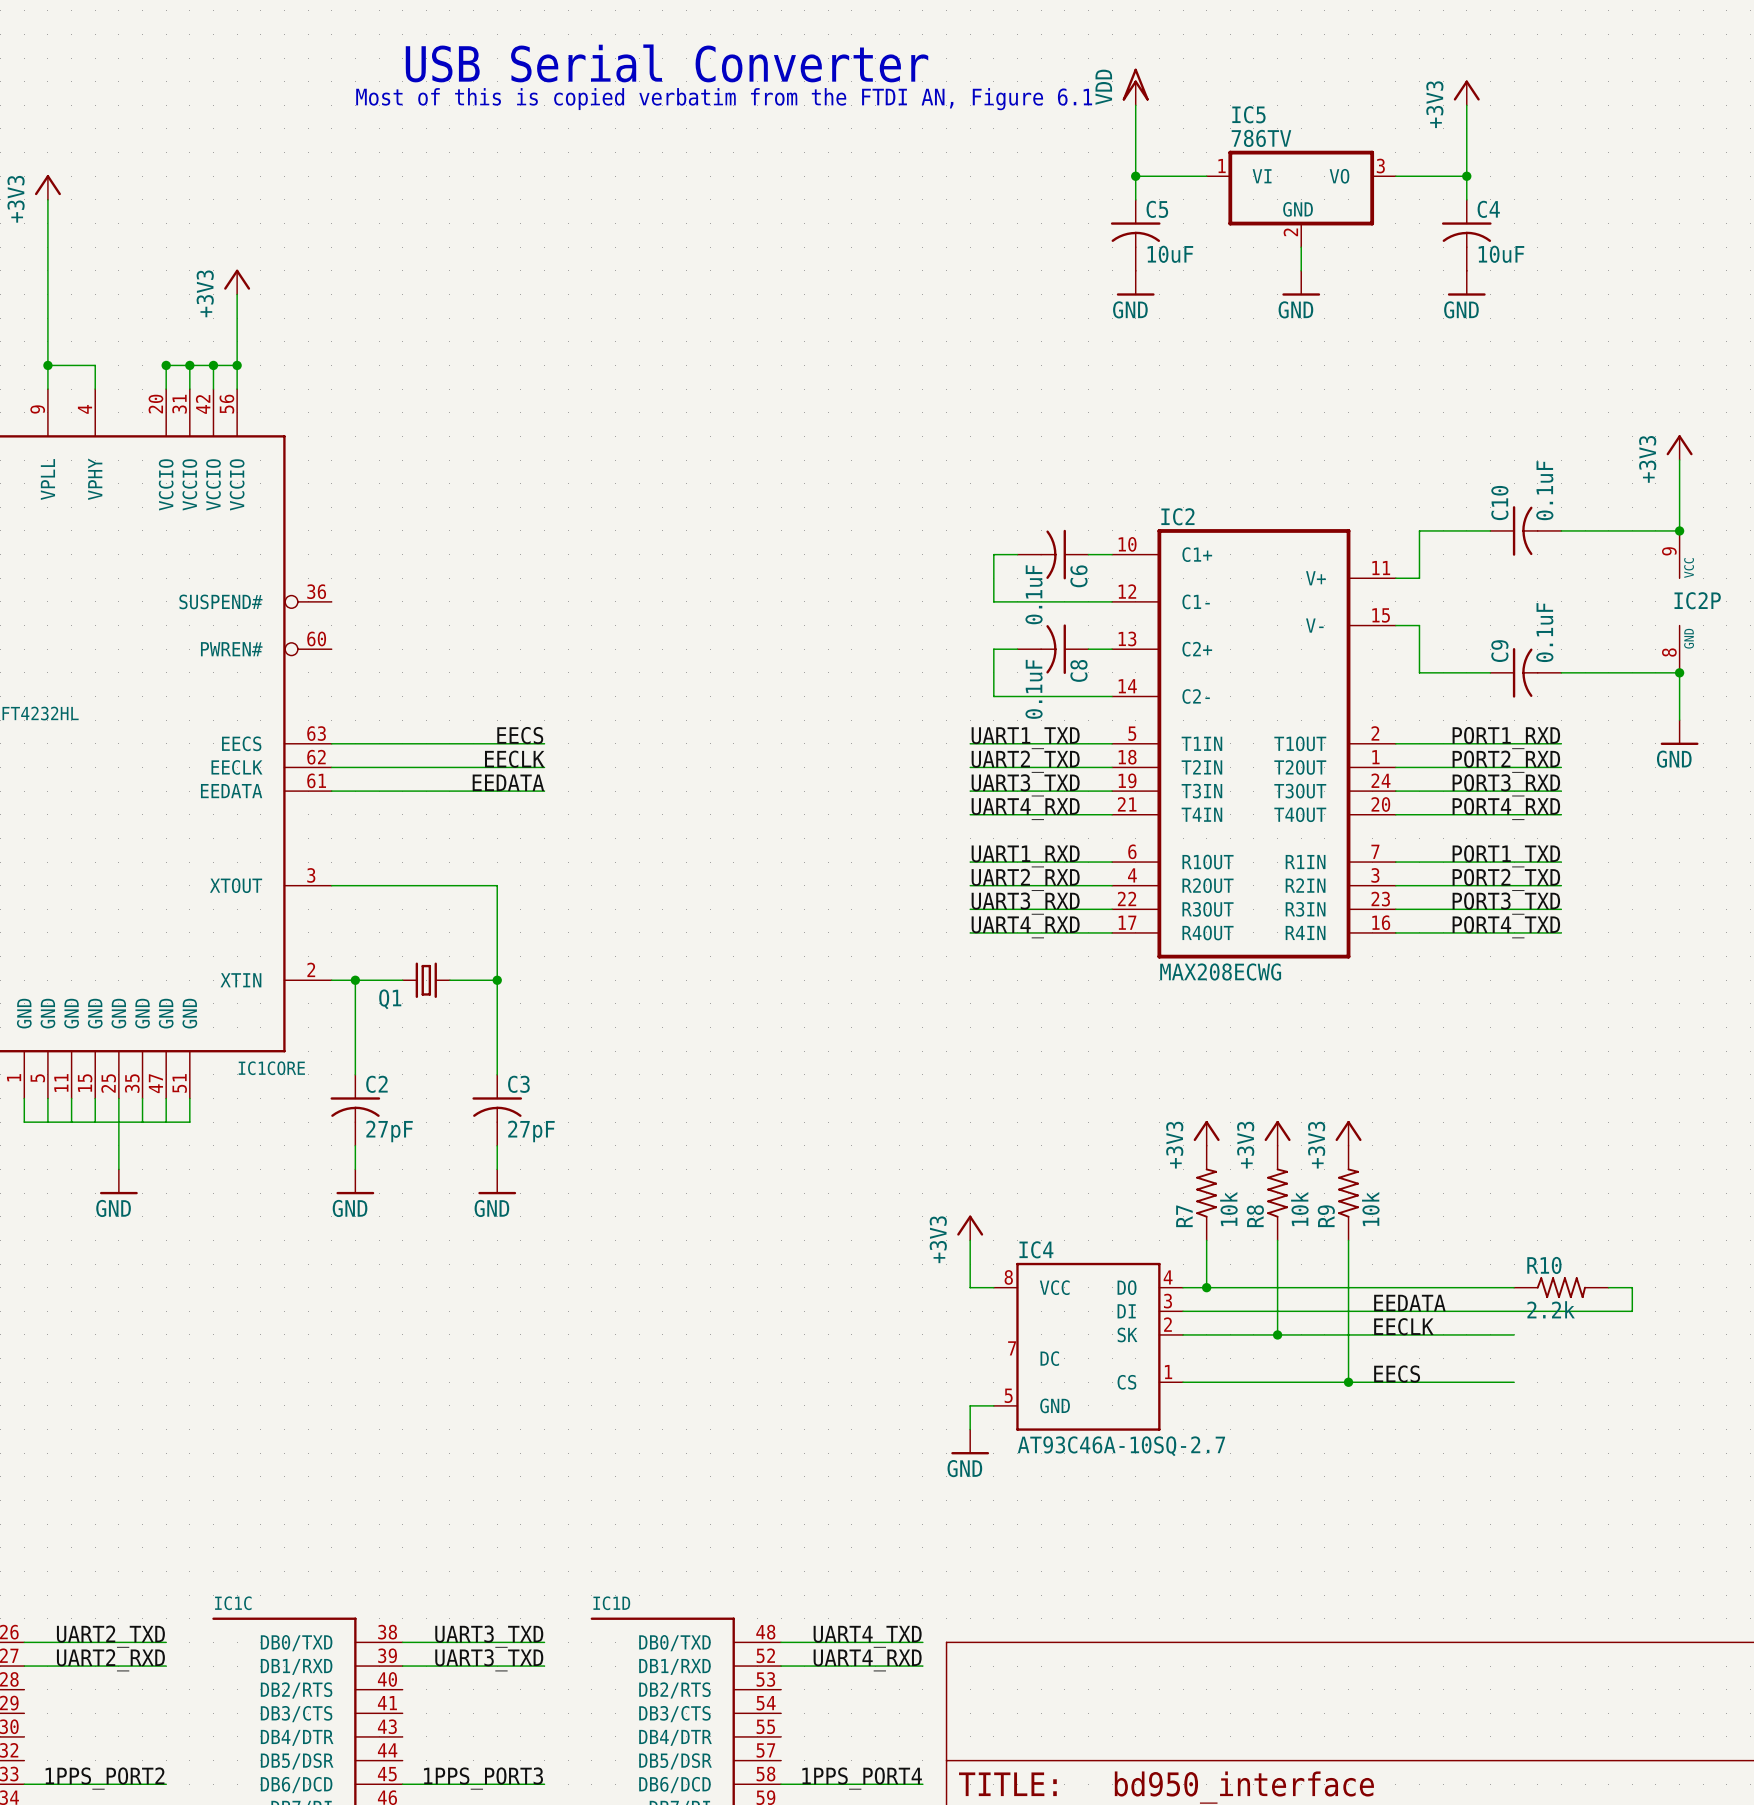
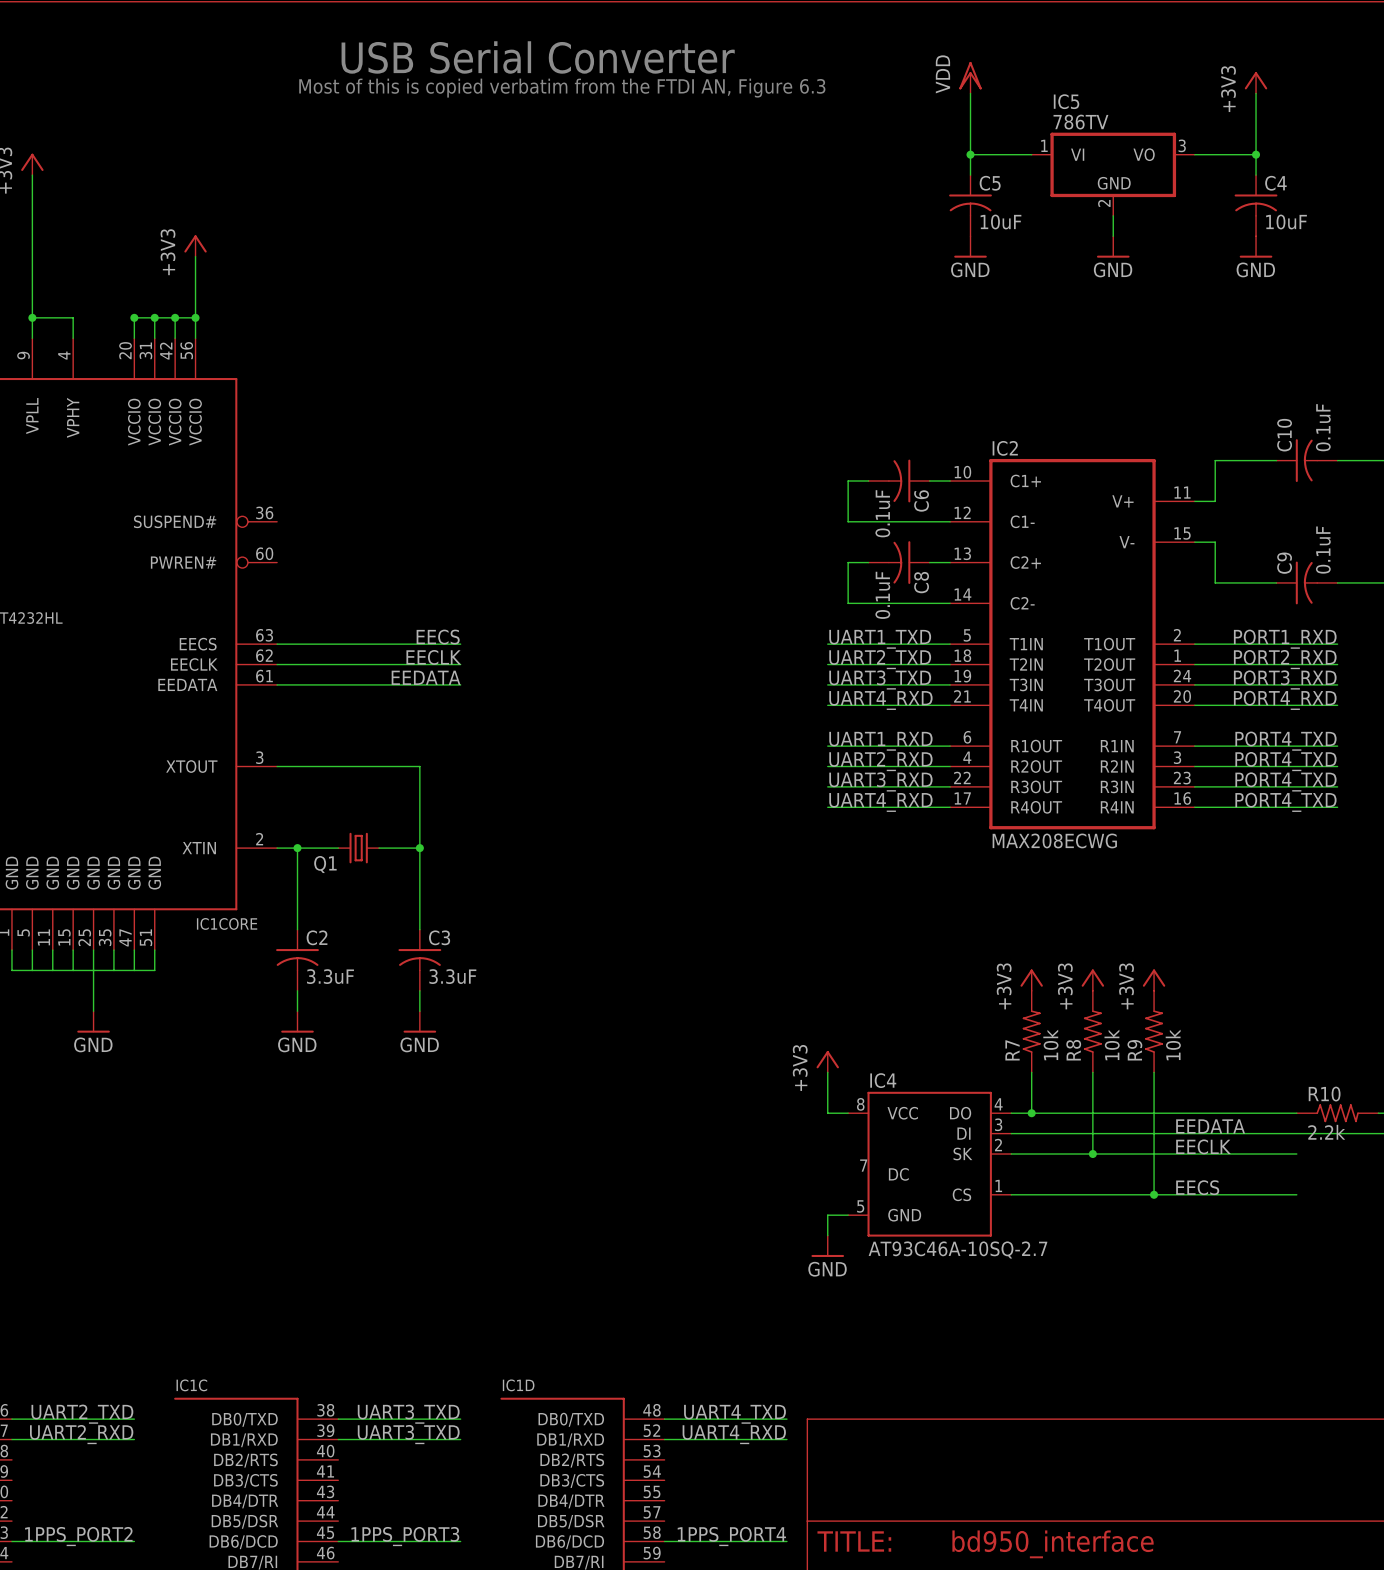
text: Most of this is copied verbatim from the FTDI AN, Figure 6.1 (724, 99) -> Most of this is copied verbatim from the FTDI AN, Figure 6.3 (562, 88)
label: PORT1_TXD (1506, 856) -> PORT4_TXD (1285, 741)
label: PORT2_TXD (1506, 879) -> PORT4_TXD (1285, 761)
label: PORT3_TXD (1506, 903) -> PORT4_TXD (1285, 781)
C2 value: 27pF (389, 1131) -> 3.3uF (330, 976)
C3 value: 27pF (531, 1131) -> 3.3uF (452, 976)

